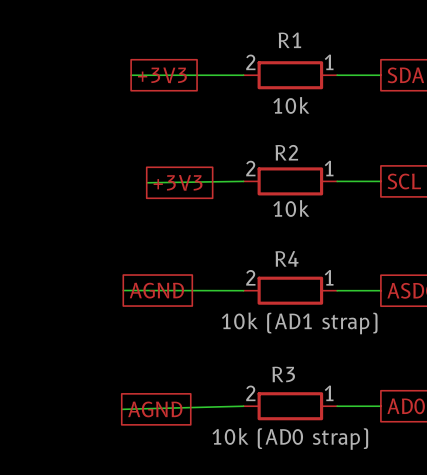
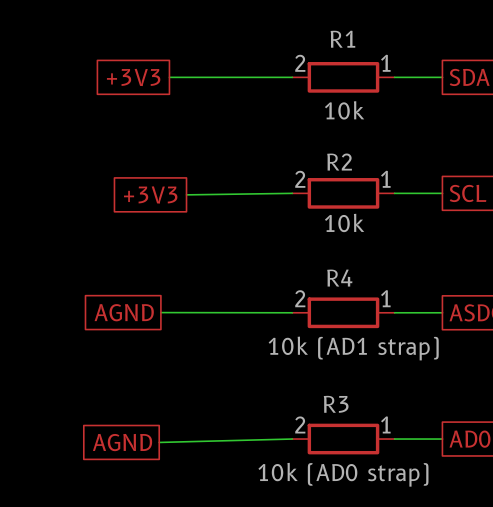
global label rotation: 0° (162, 75) -> 180° (133, 77)
global label rotation: 0° (178, 182) -> 180° (150, 194)
global label rotation: 0° (156, 290) -> 180° (124, 312)
global label position: AGND (156, 290) -> AGND (124, 312)
global label rotation: 0° (155, 409) -> 180° (122, 442)
global label position: AGND (155, 409) -> AGND (122, 442)

